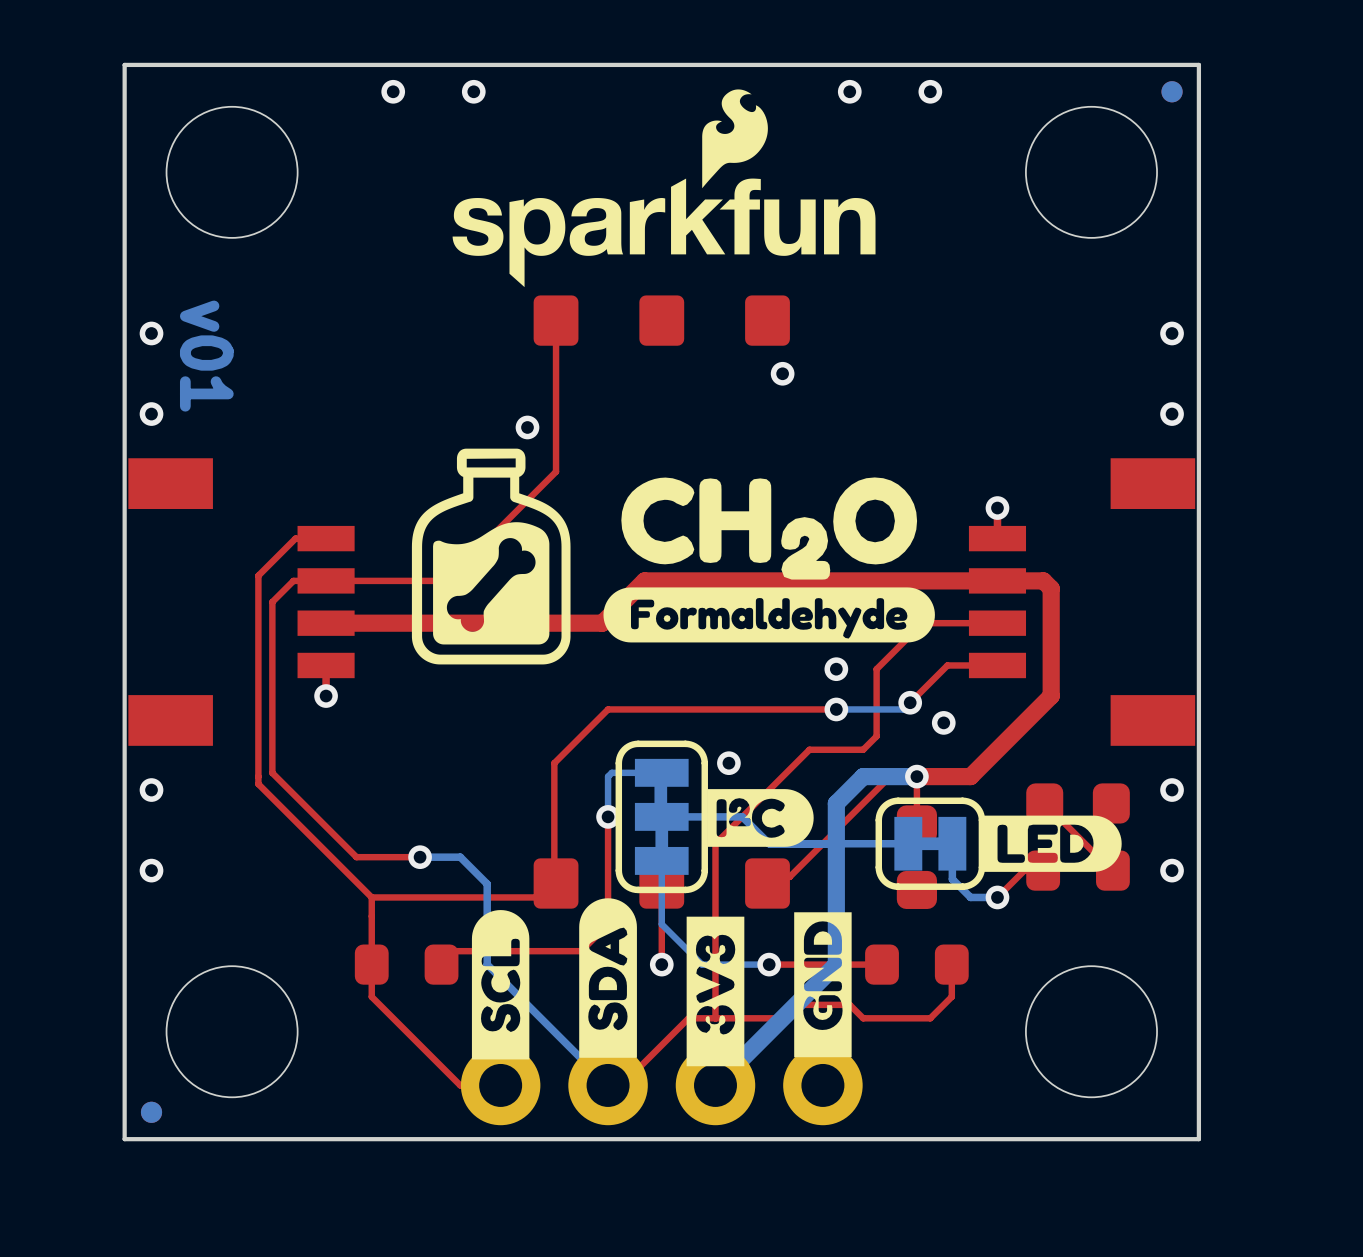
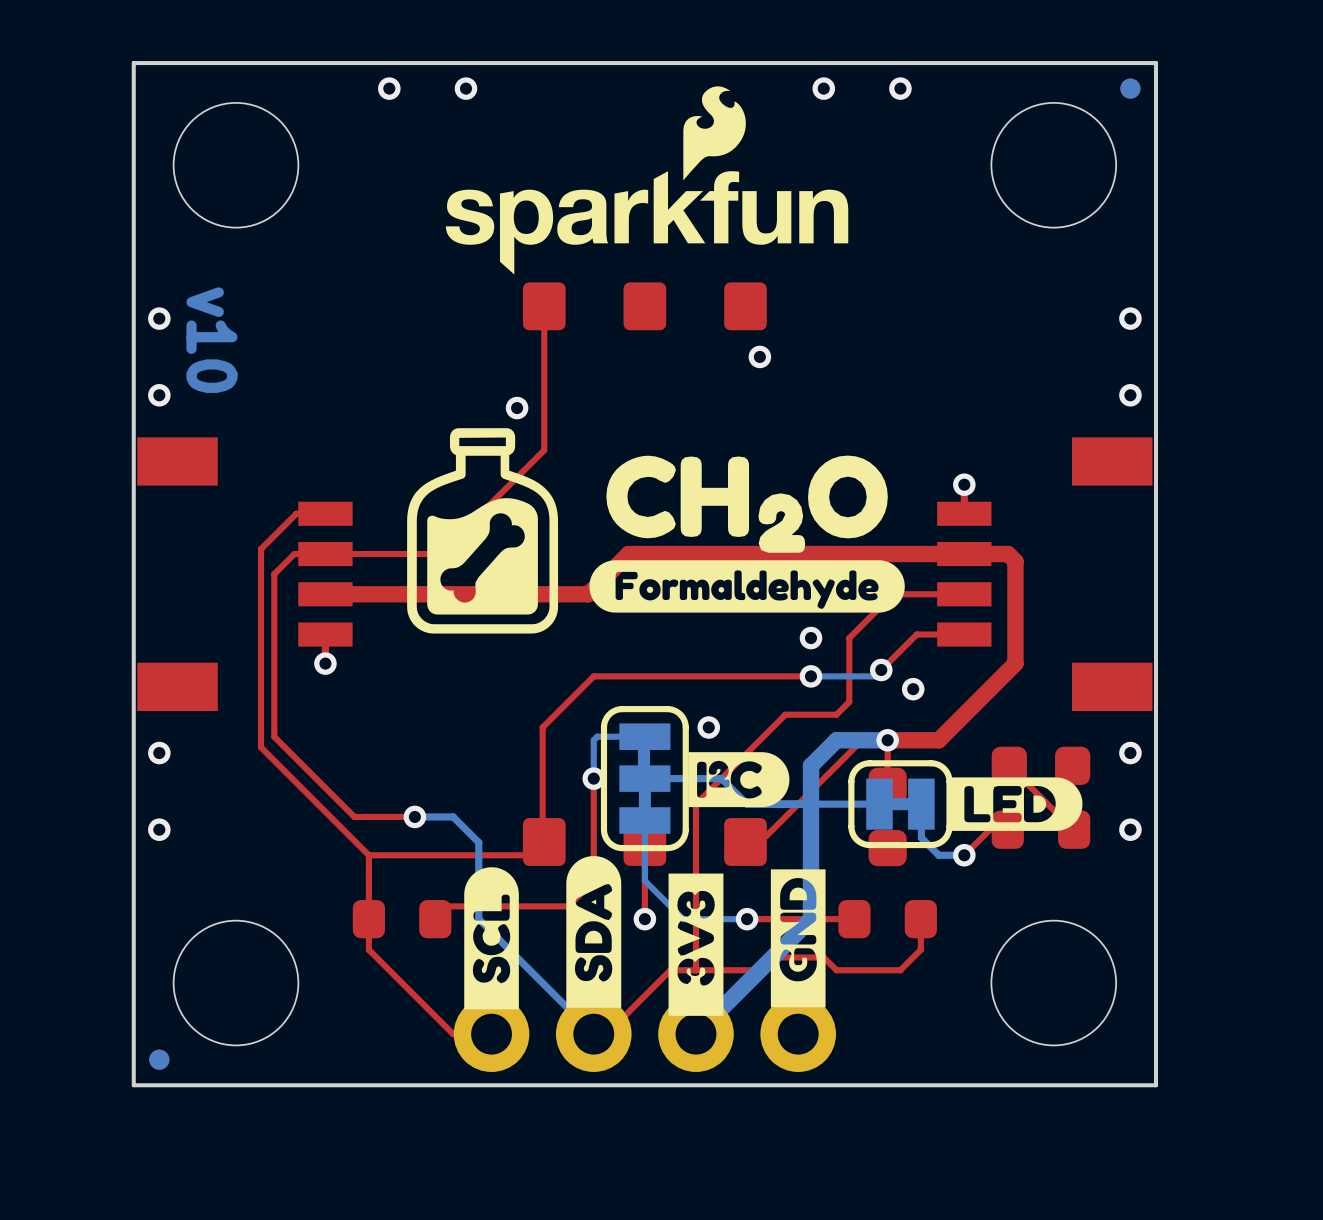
text: v01 (206, 356) -> v10 (211, 340)

